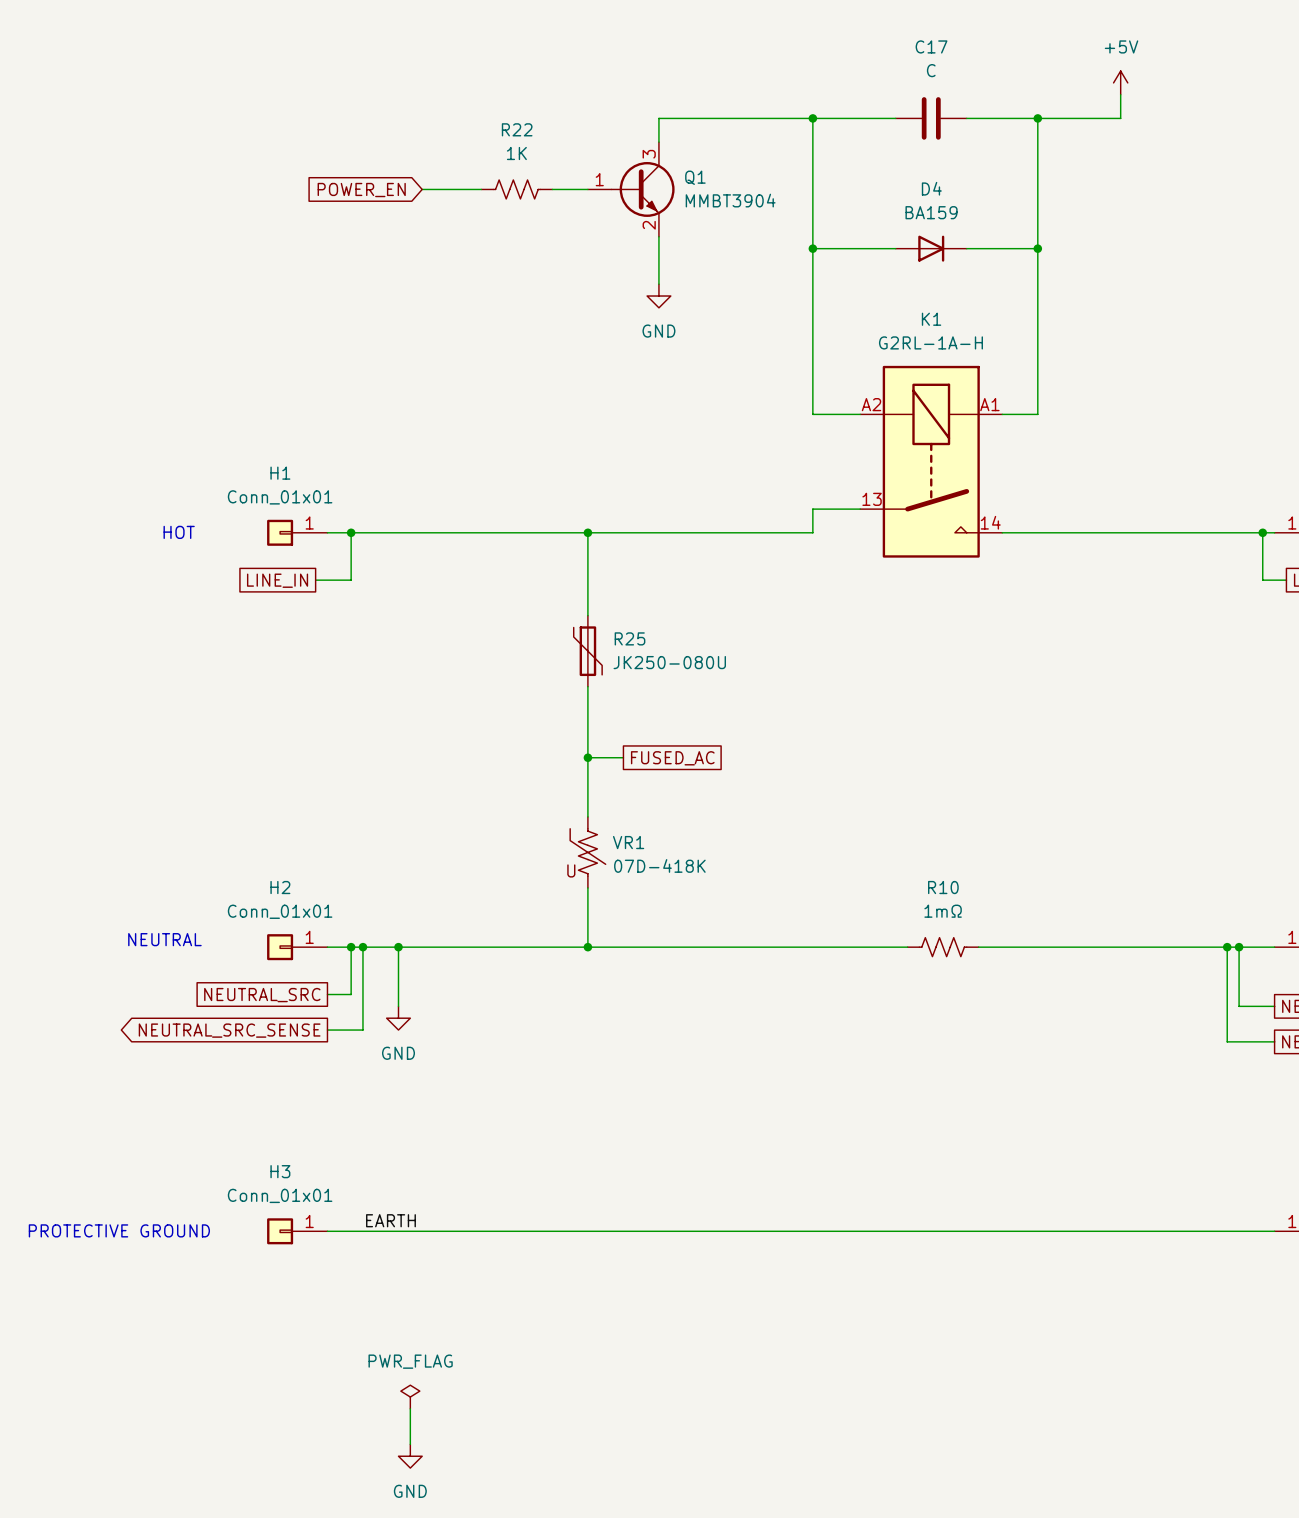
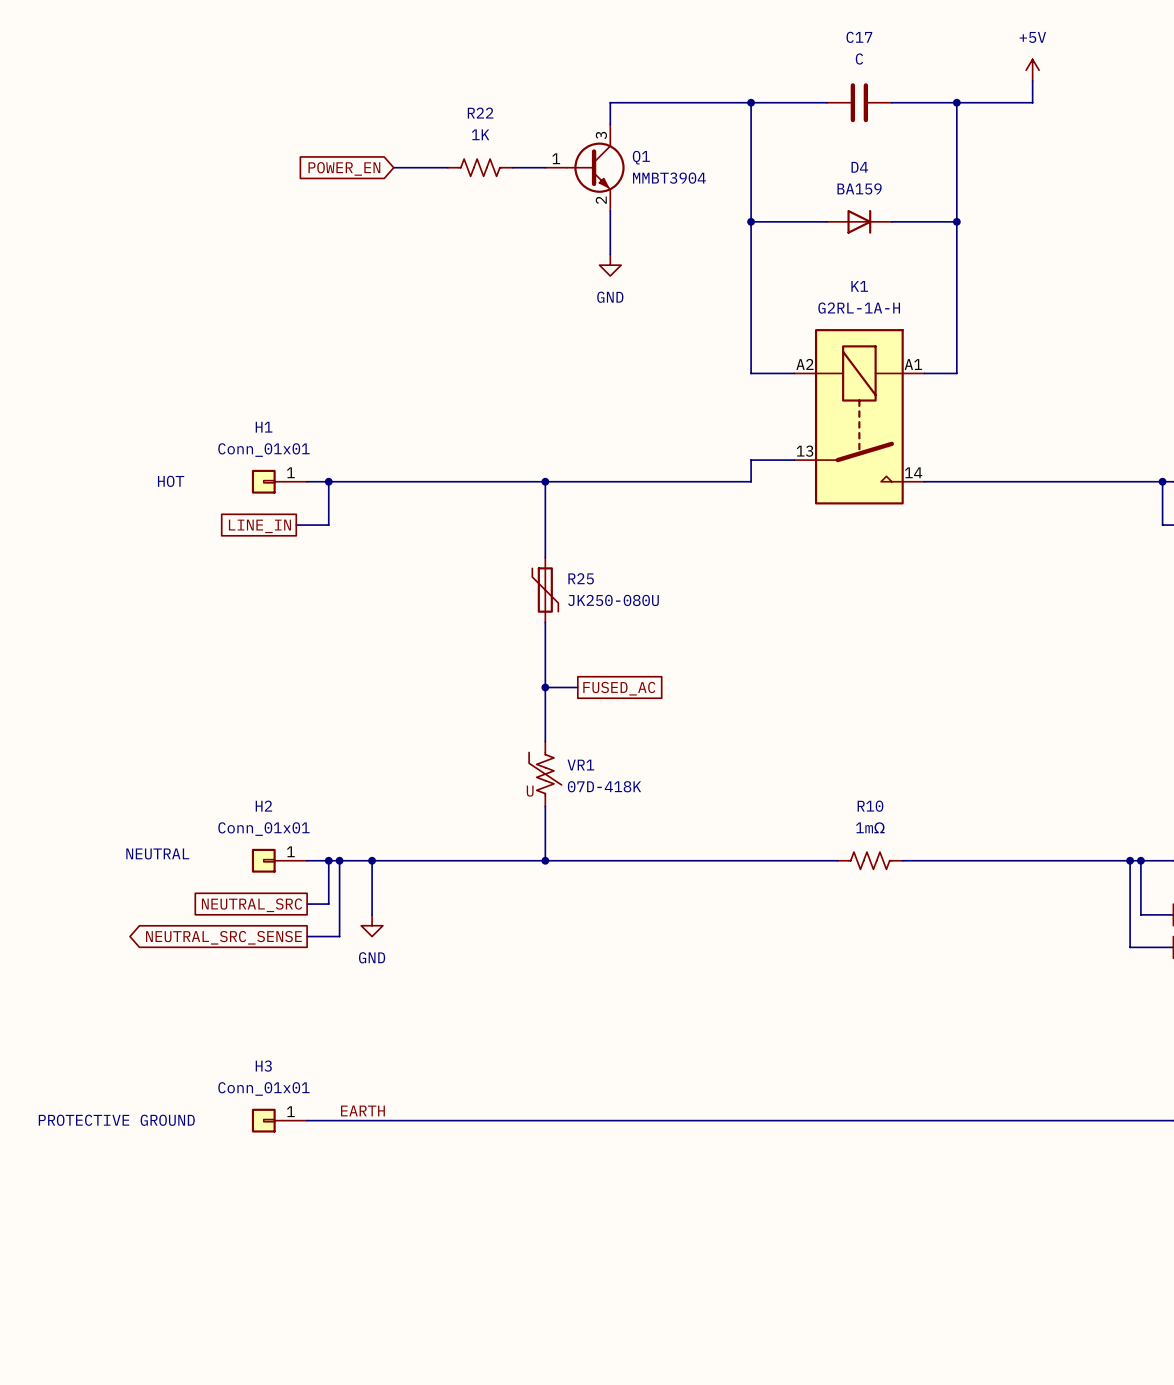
power symbol: PWR_FLAG (410, 1397) -> none
wire: (410, 1408) (410, 1444) -> none
power symbol: GND (410, 1456) -> none

